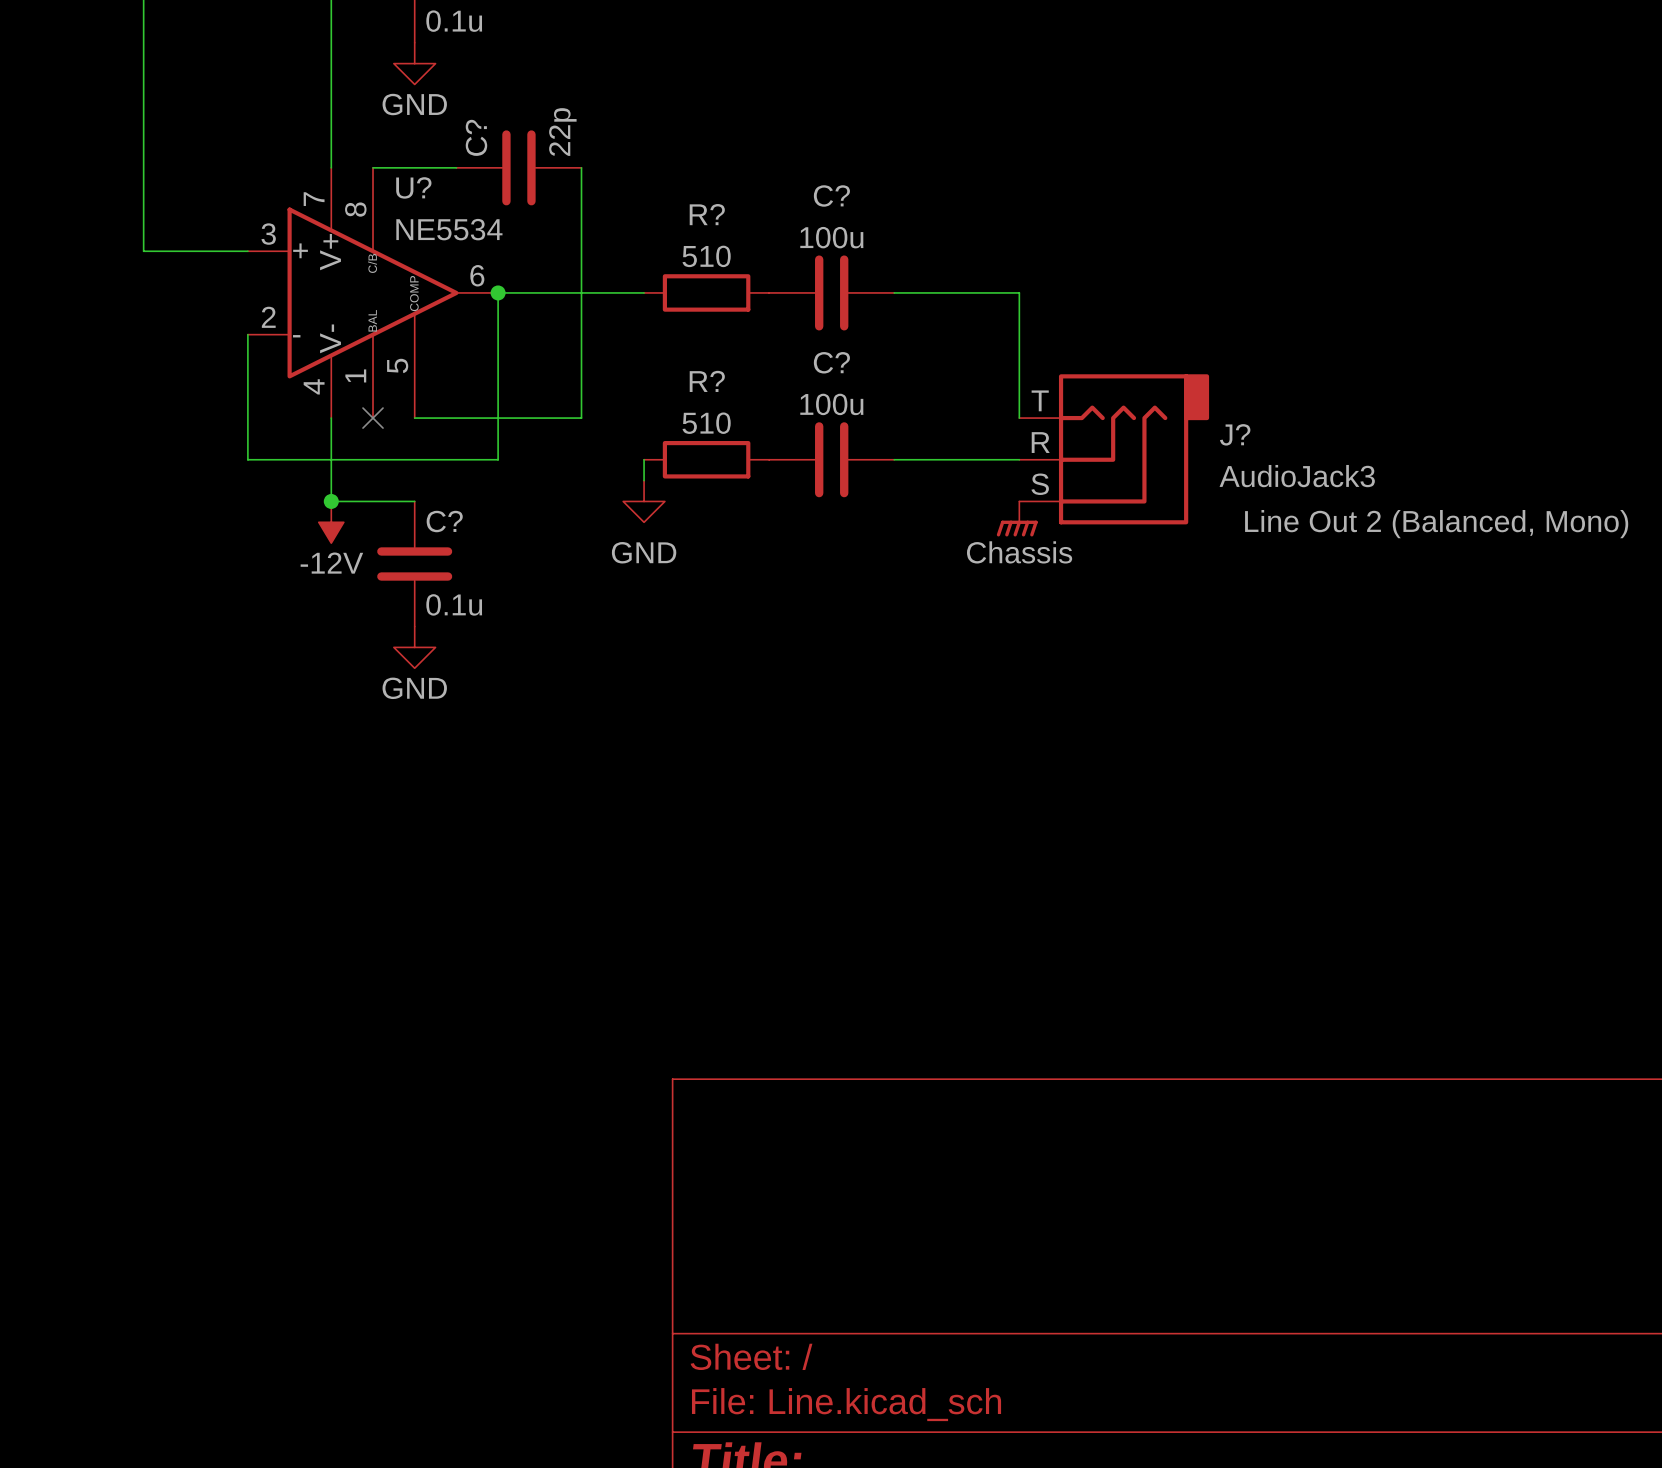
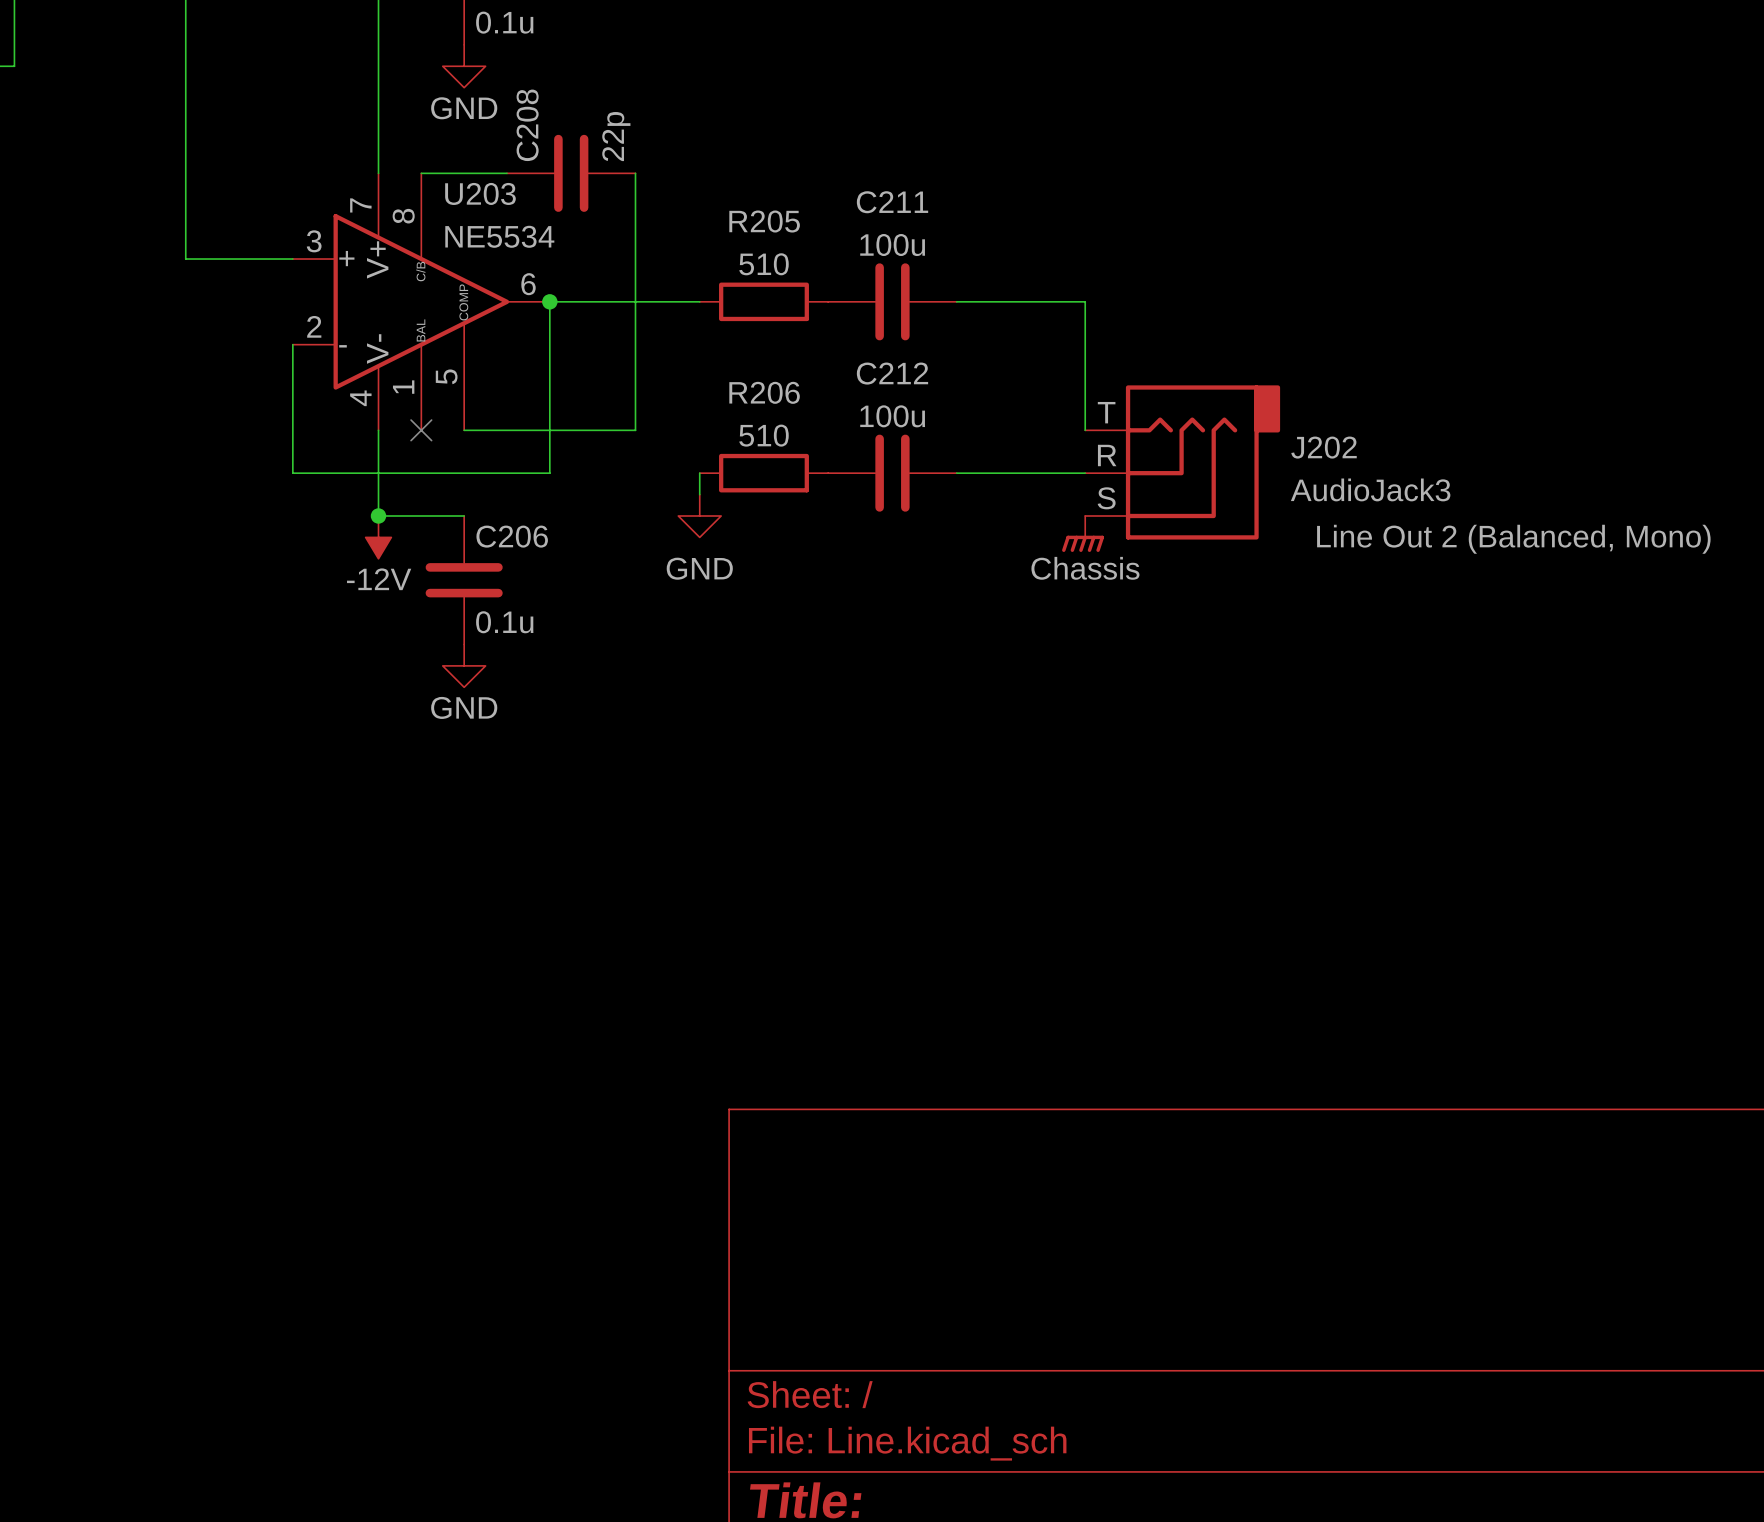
C? name: C? (476, 137) -> C208 (527, 125)
U? name: U? (413, 187) -> U203 (480, 193)
C? name: C? (831, 195) -> C211 (892, 202)
R? name: R? (707, 214) -> R205 (764, 221)
C? name: C? (831, 362) -> C212 (892, 373)
R? name: R? (707, 381) -> R206 (764, 392)
J? name: J? (1235, 434) -> J202 (1324, 447)
C? name: C? (444, 521) -> C206 (512, 536)

